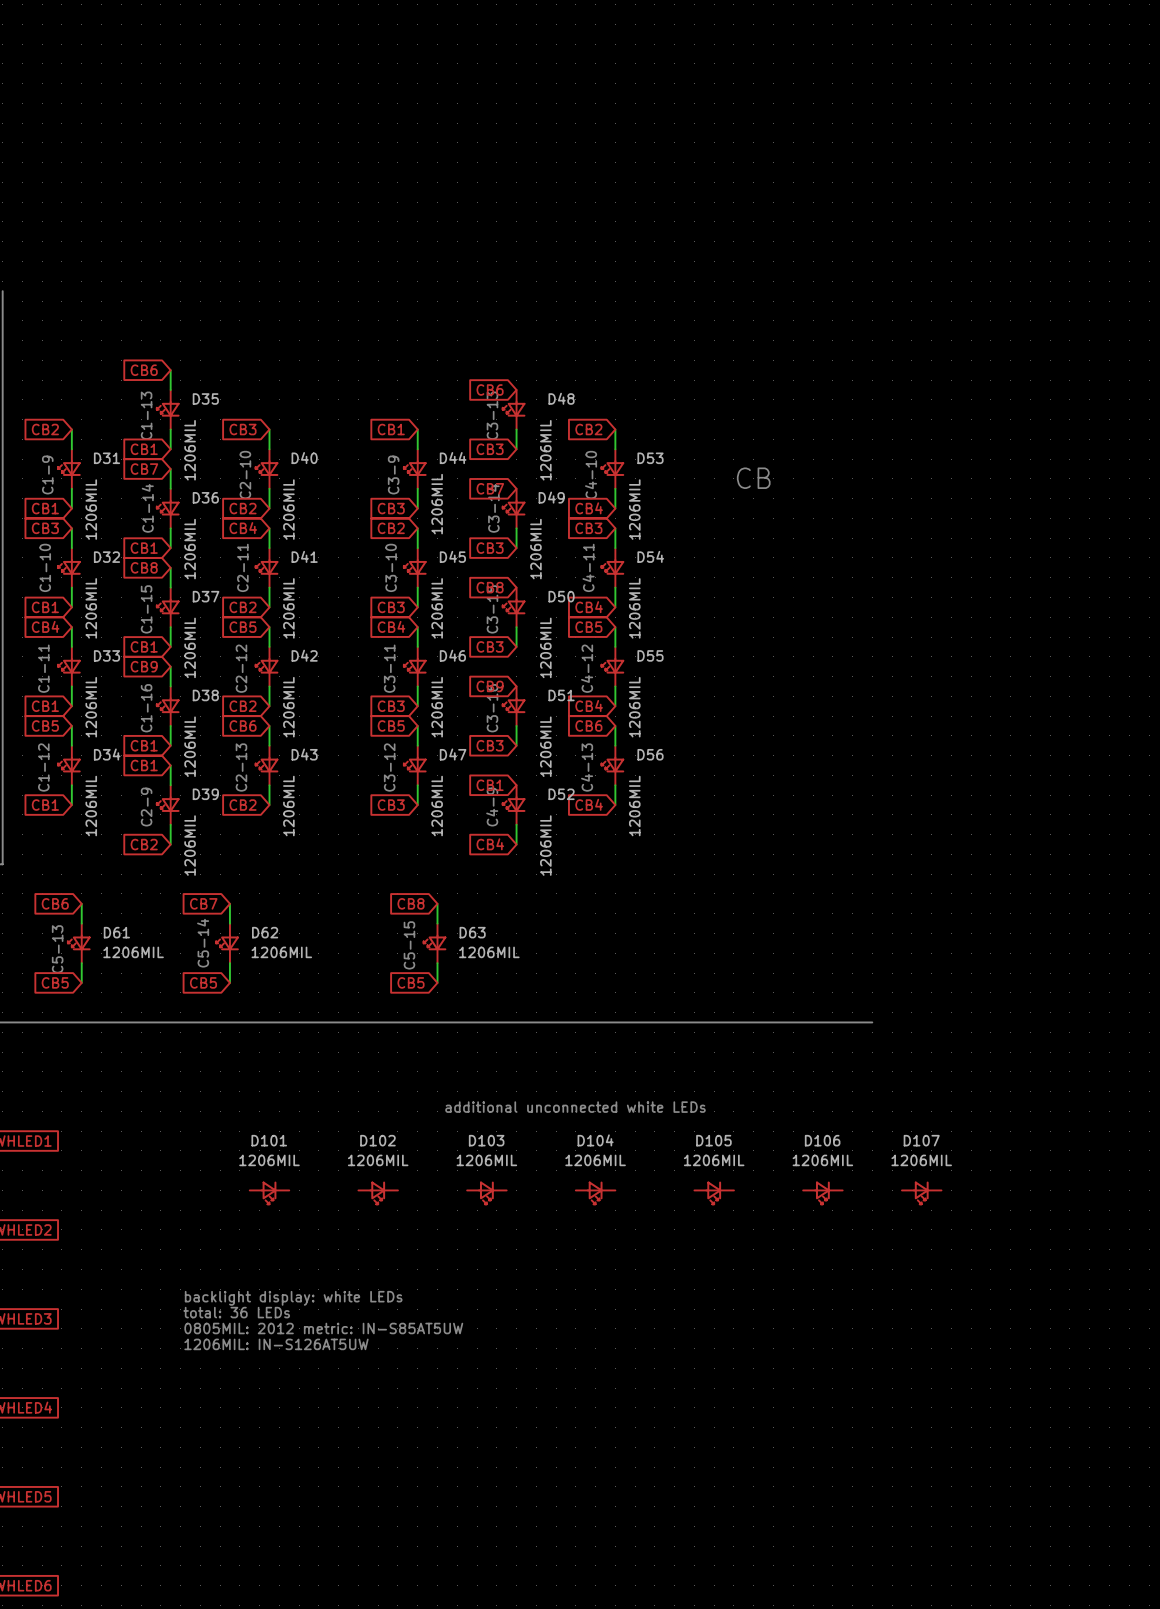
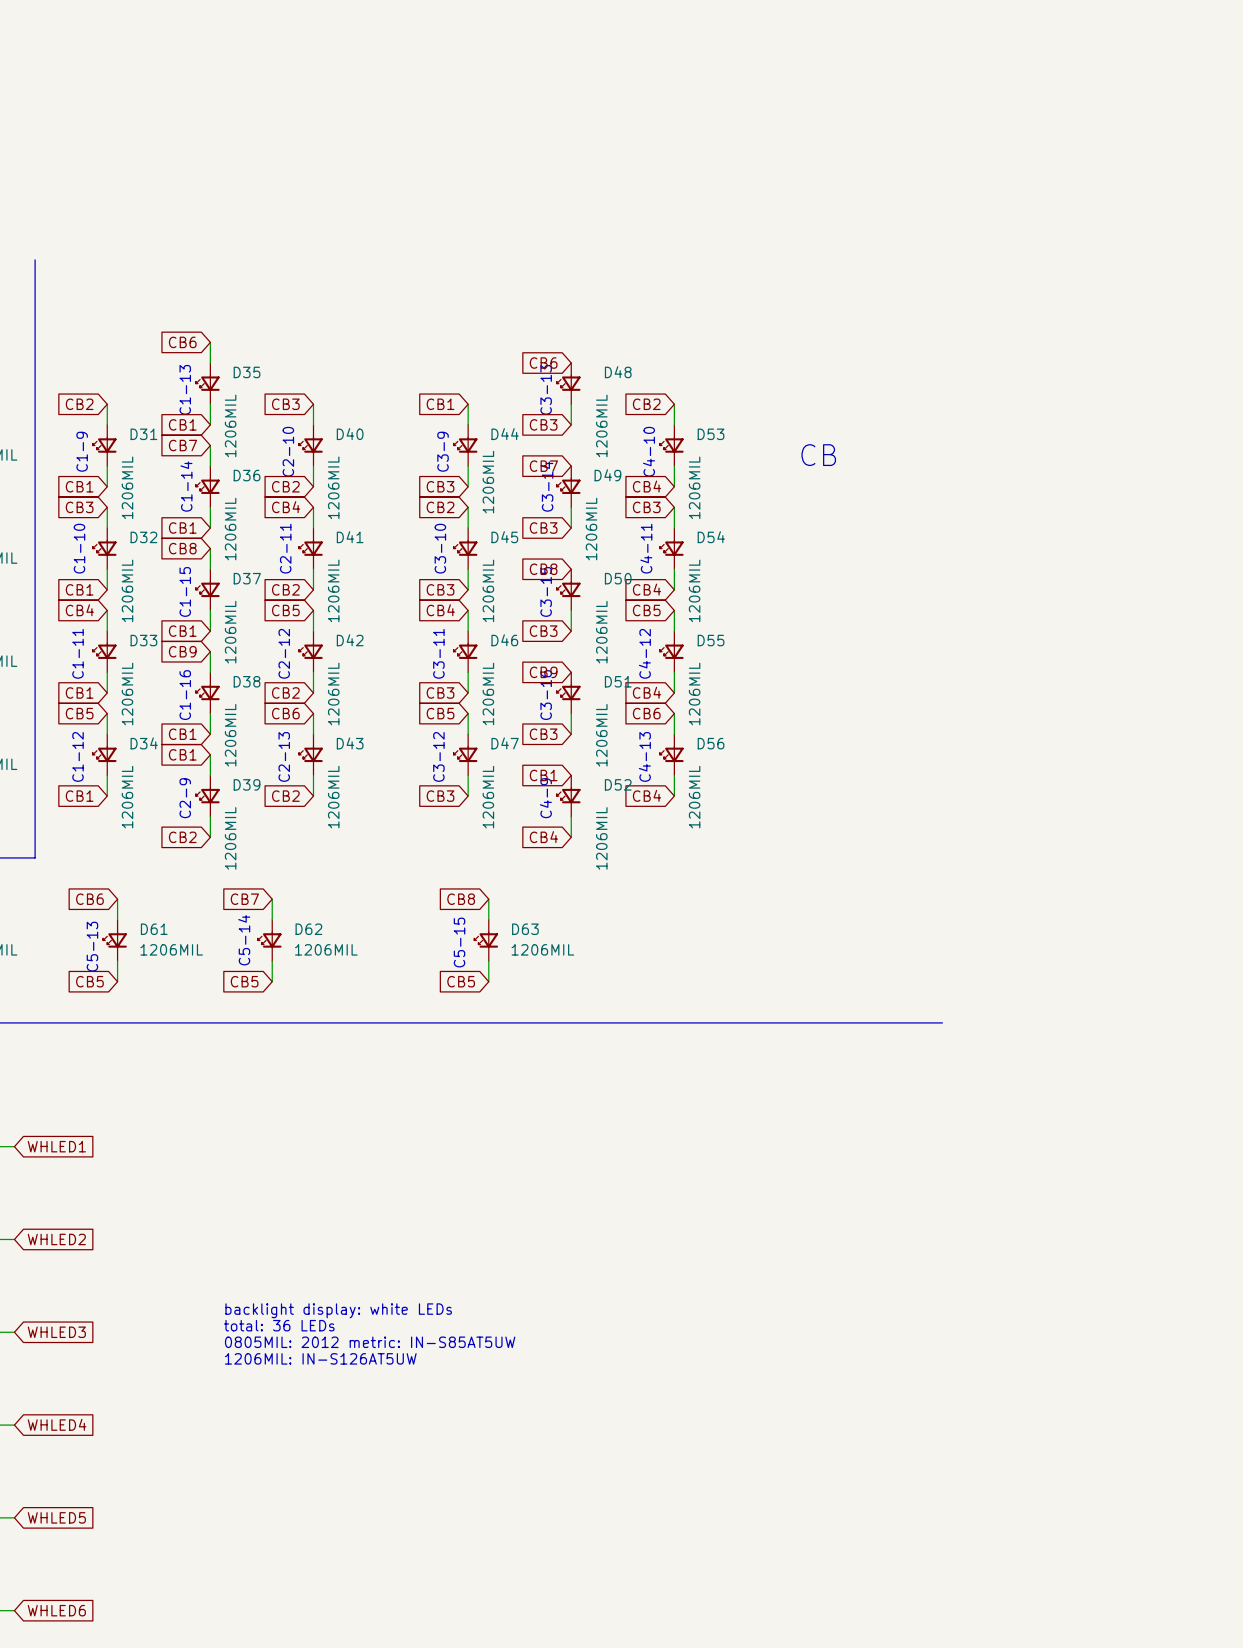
text: additional unconnected white LEDs (575, 1107) -> none
D101: 1206MIL (269, 1192) -> none
D102: 1206MIL (378, 1192) -> none
D103: 1206MIL (486, 1192) -> none
D104: 1206MIL (595, 1192) -> none
D105: 1206MIL (714, 1192) -> none
D106: 1206MIL (822, 1192) -> none
D107: 1206MIL (921, 1192) -> none

